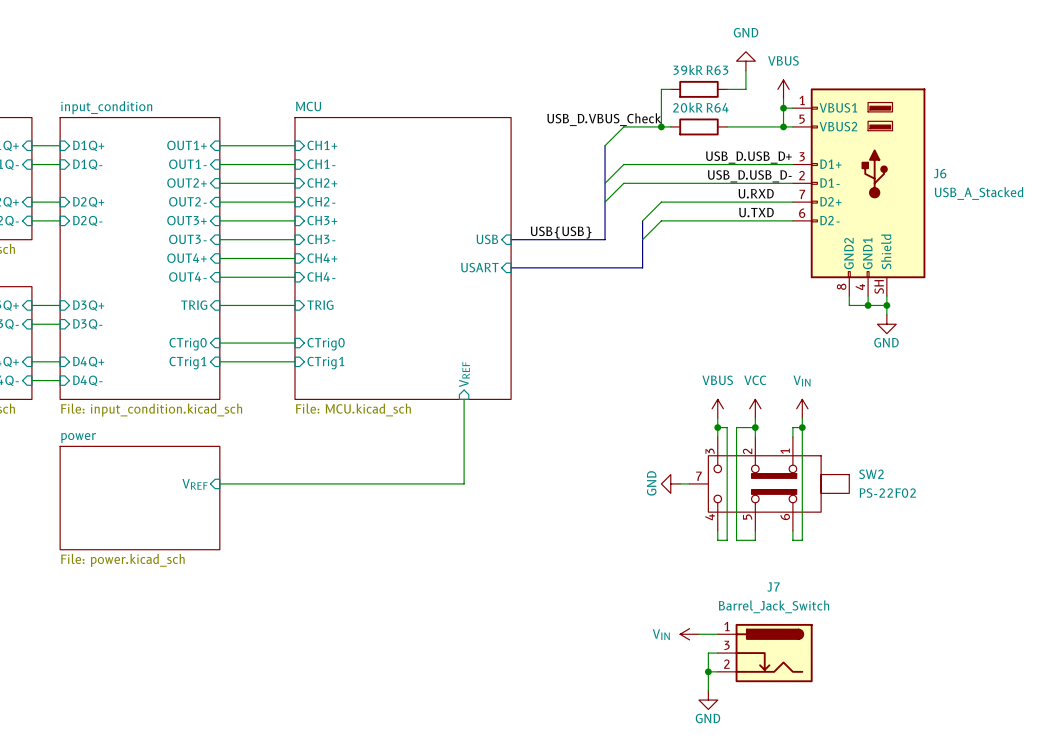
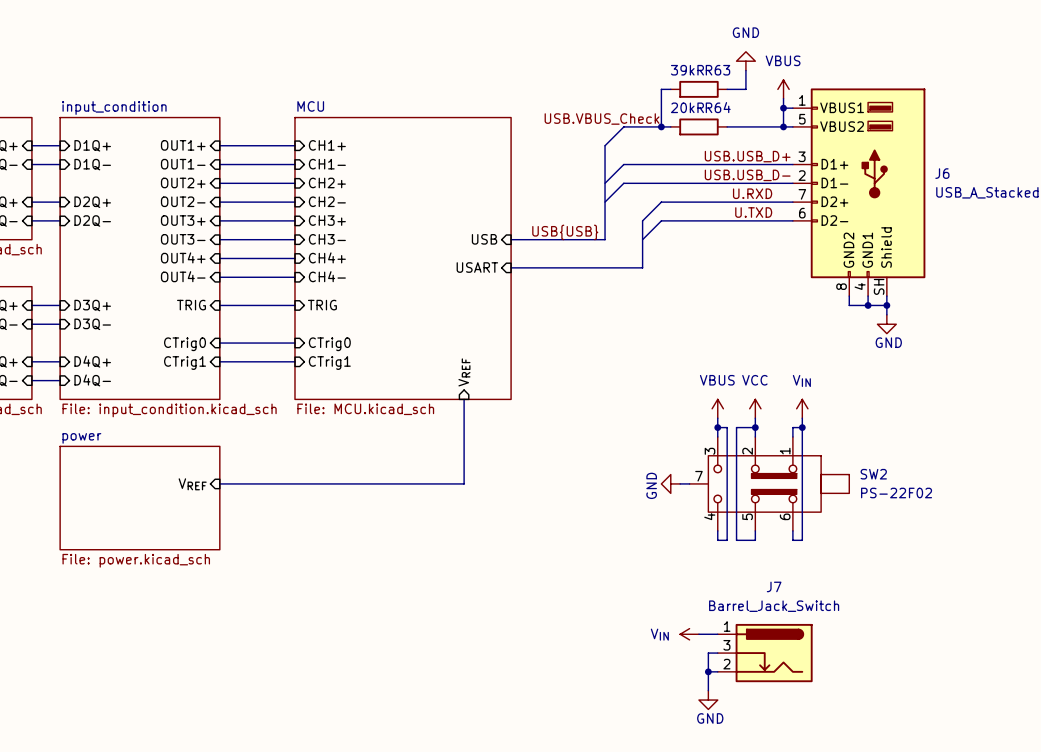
label: USB_D.VBUS_Check (604, 119) -> USB.VBUS_Check (602, 119)
label: USB_D.USB_D+ (748, 157) -> USB.USB_D+ (747, 156)
label: USB_D.USB_D- (749, 176) -> USB.USB_D- (747, 175)

